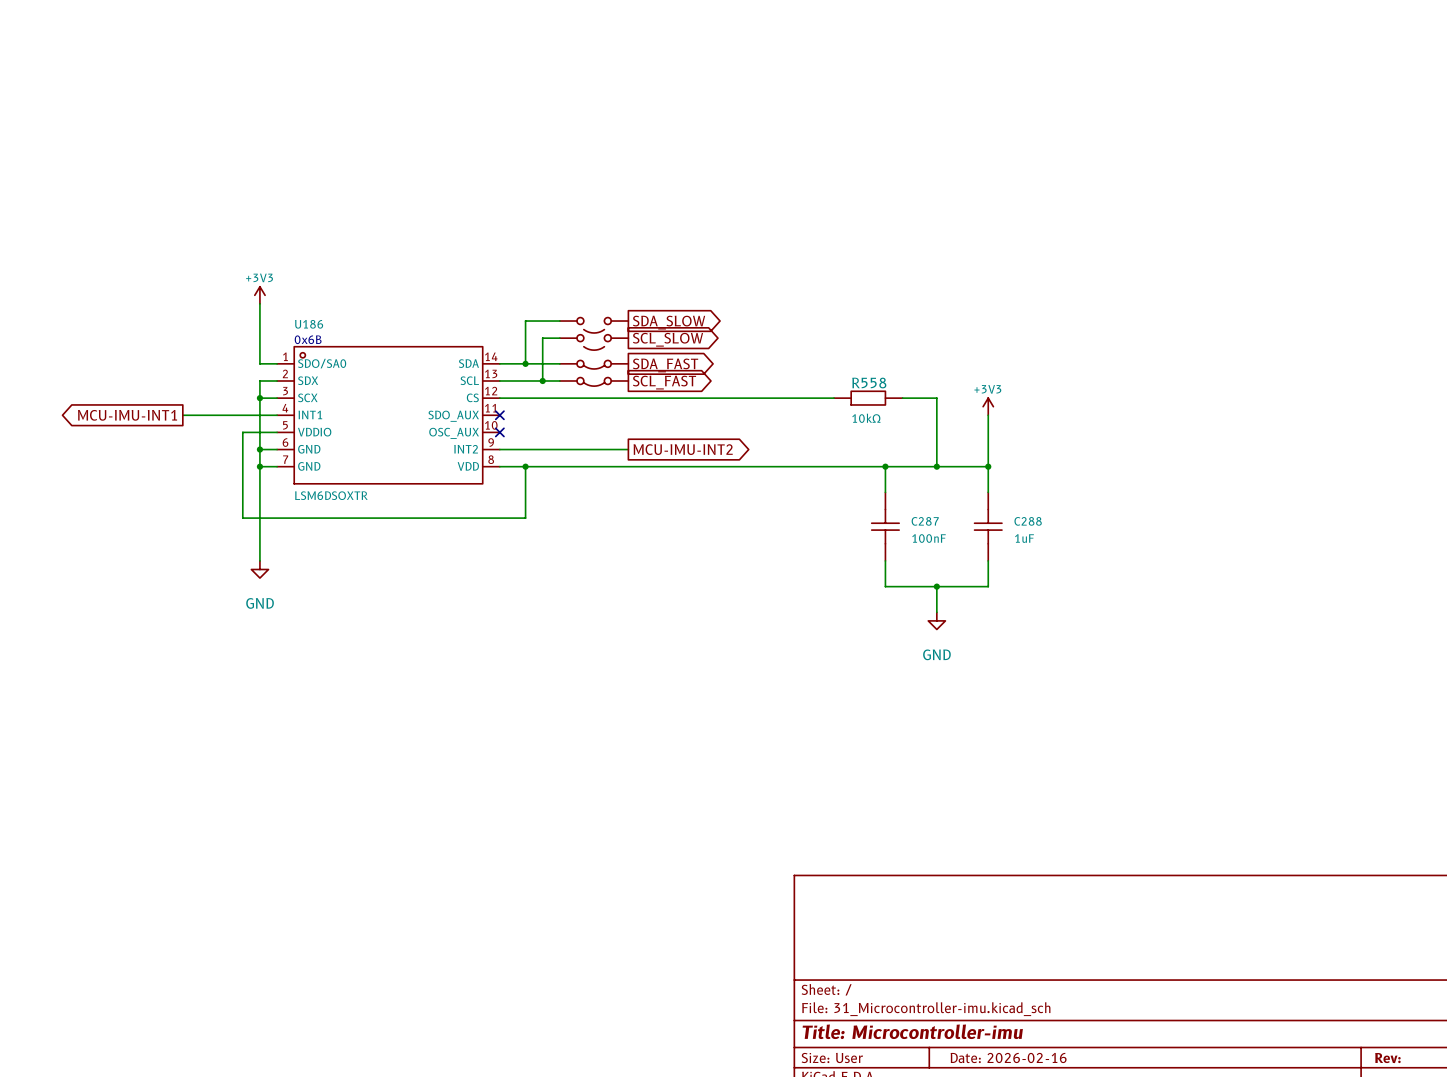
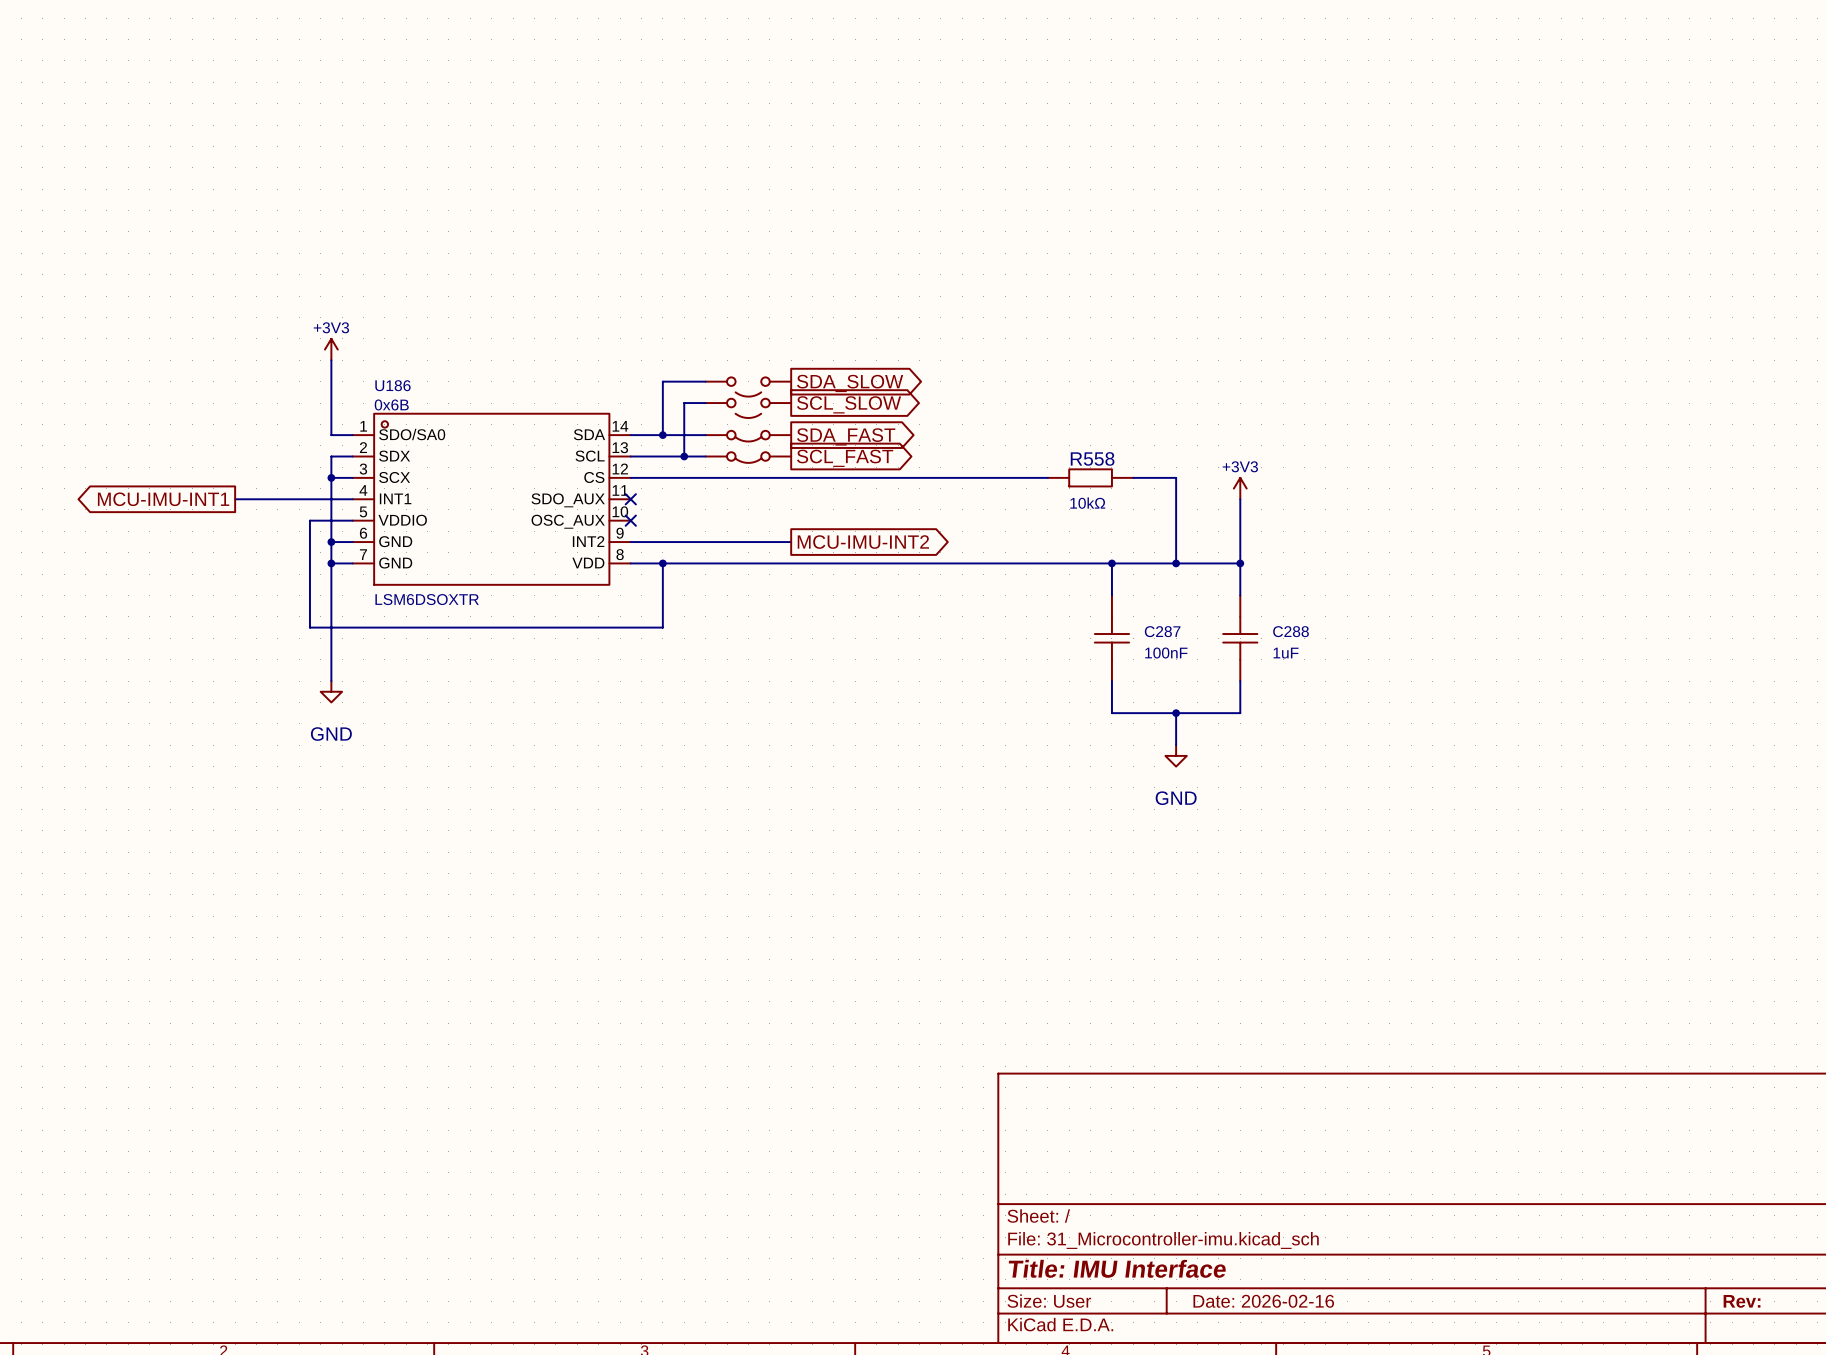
title block: Title: Microcontroller-imu (912, 1031) -> Title: IMU Interface (1117, 1268)

